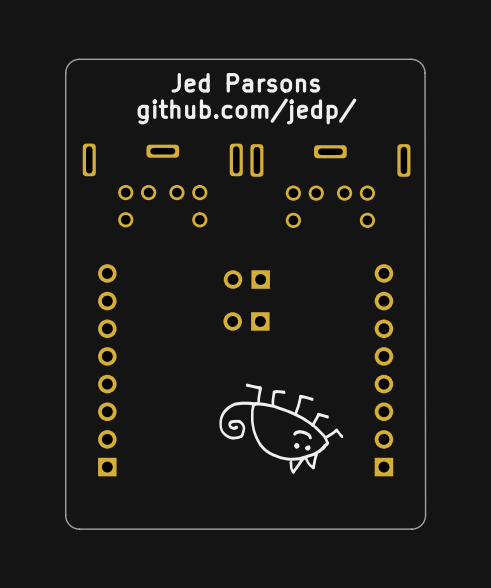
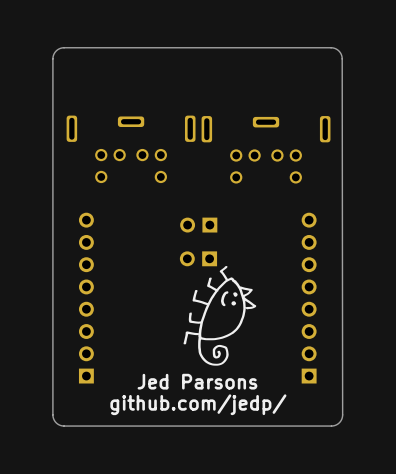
text: Jed Parsons (245, 82) -> none
text: github.com/jedp/ (246, 111) -> none
drawing: none -> [183, 265, 257, 366]
drawing: [219, 383, 344, 474] -> none
text: none -> Jed Parsons (197, 381)
text: none -> github.com/jedp/ (198, 404)

